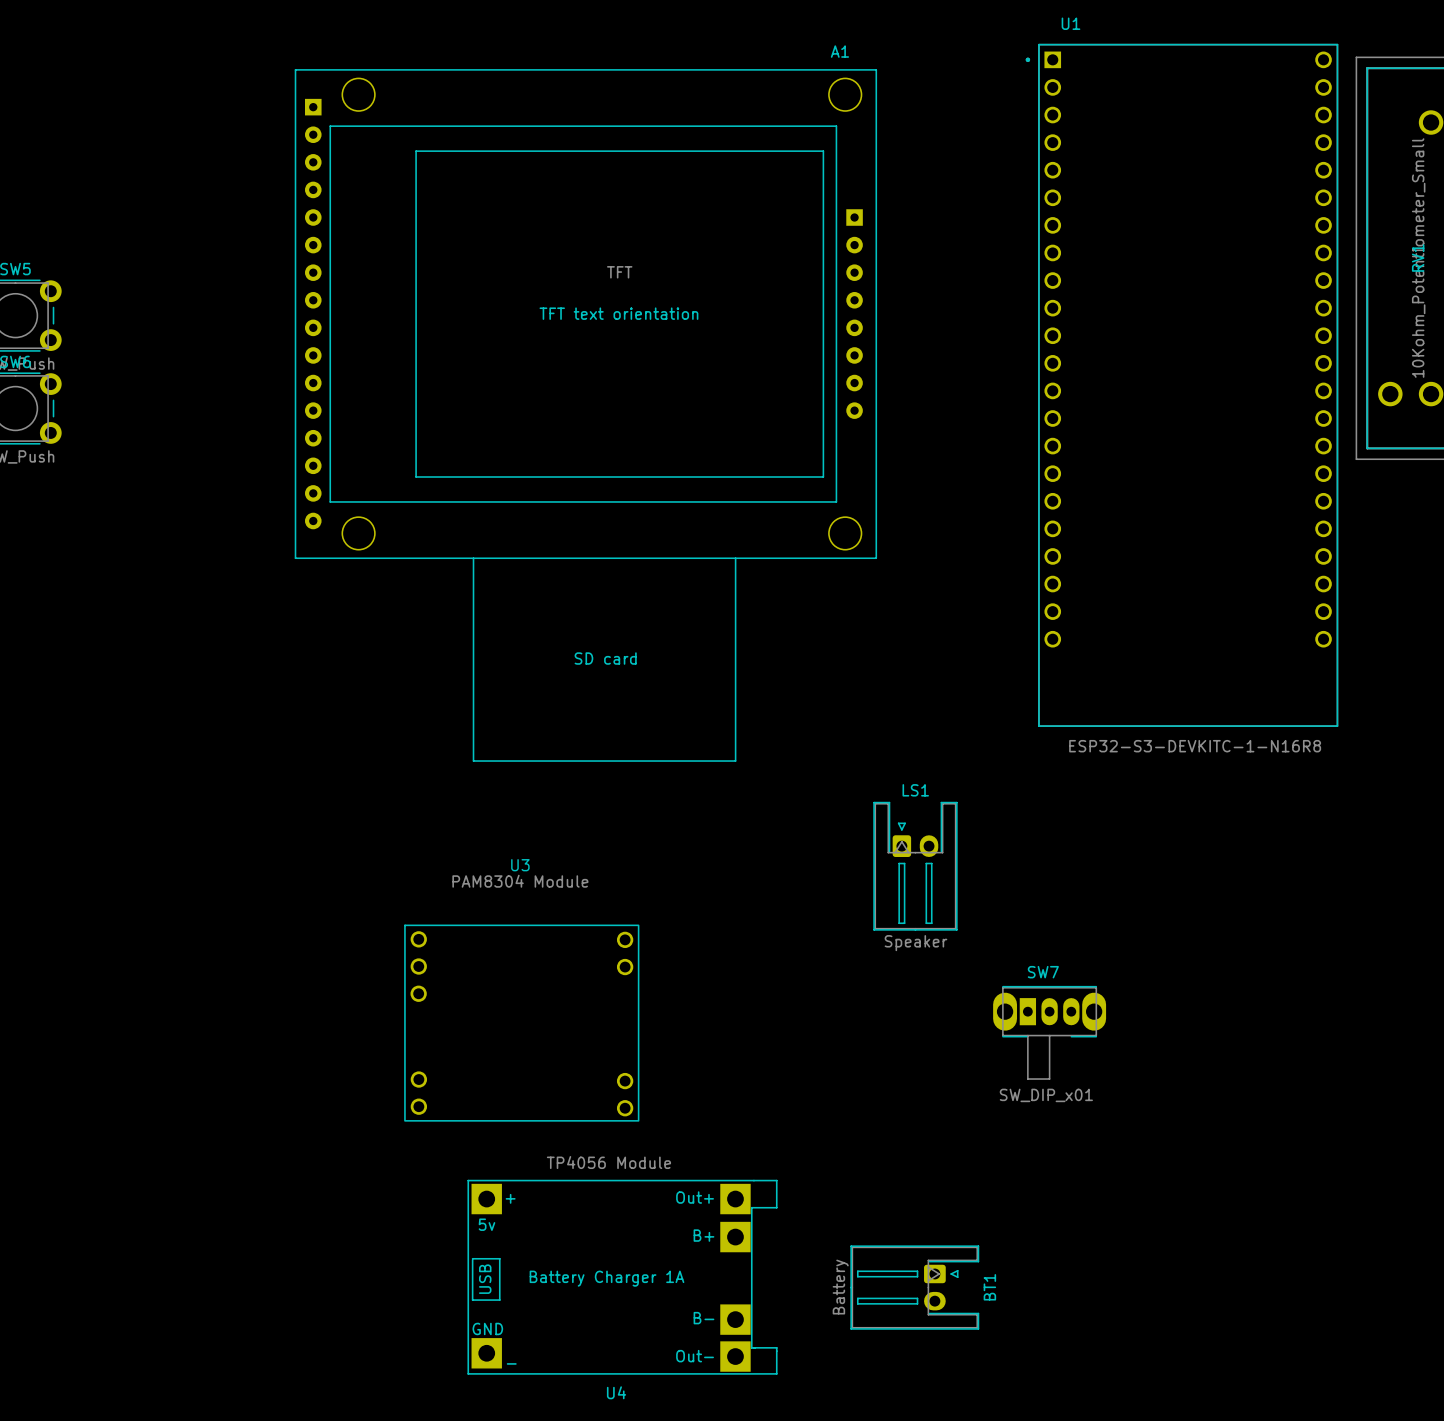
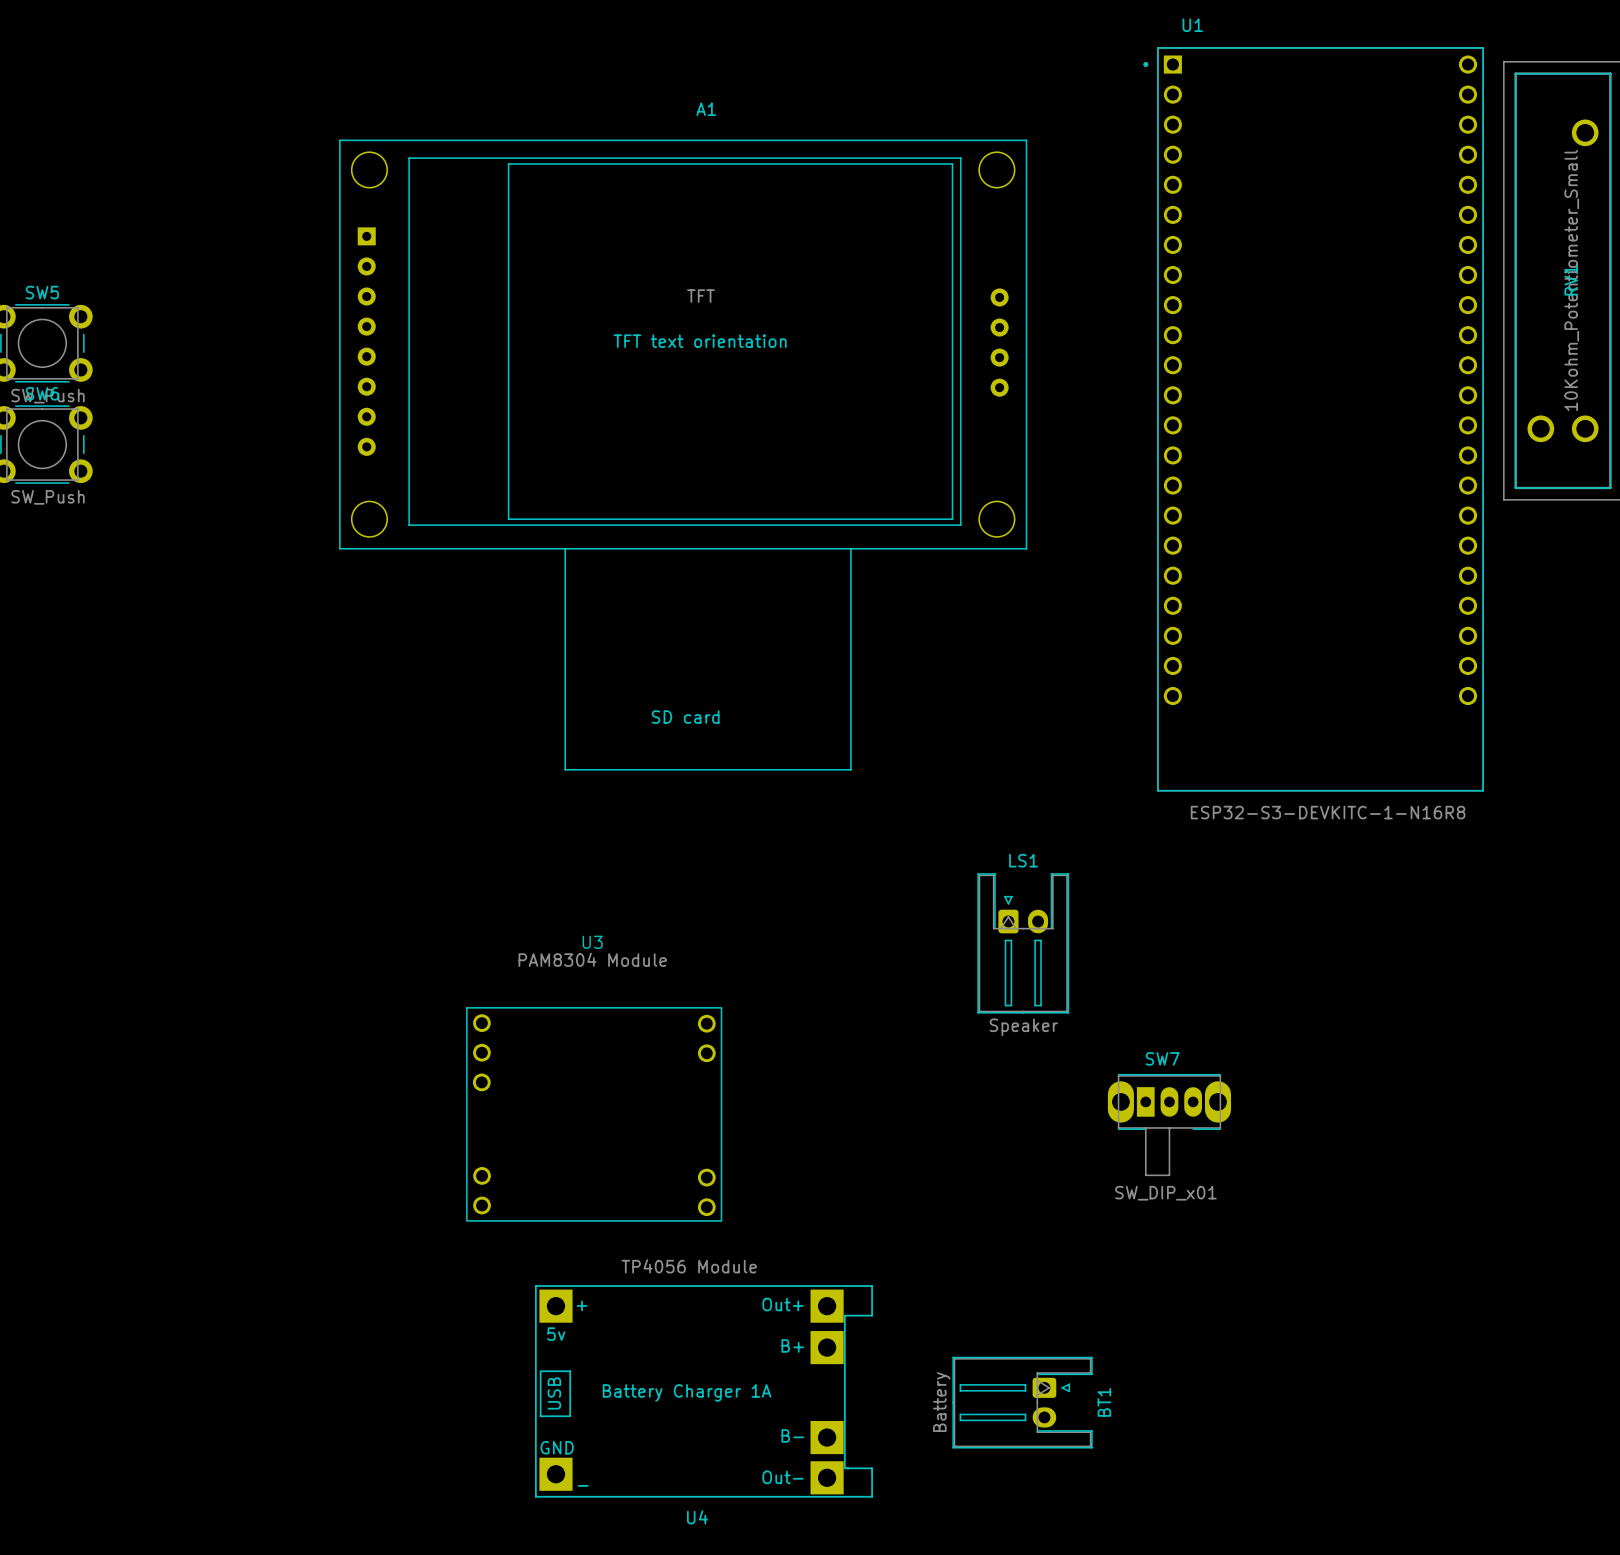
A1 name position: A1 (839, 51) -> A1 (706, 109)
A1 footprint: [294, 69, 877, 762] -> [339, 139, 1028, 771]

